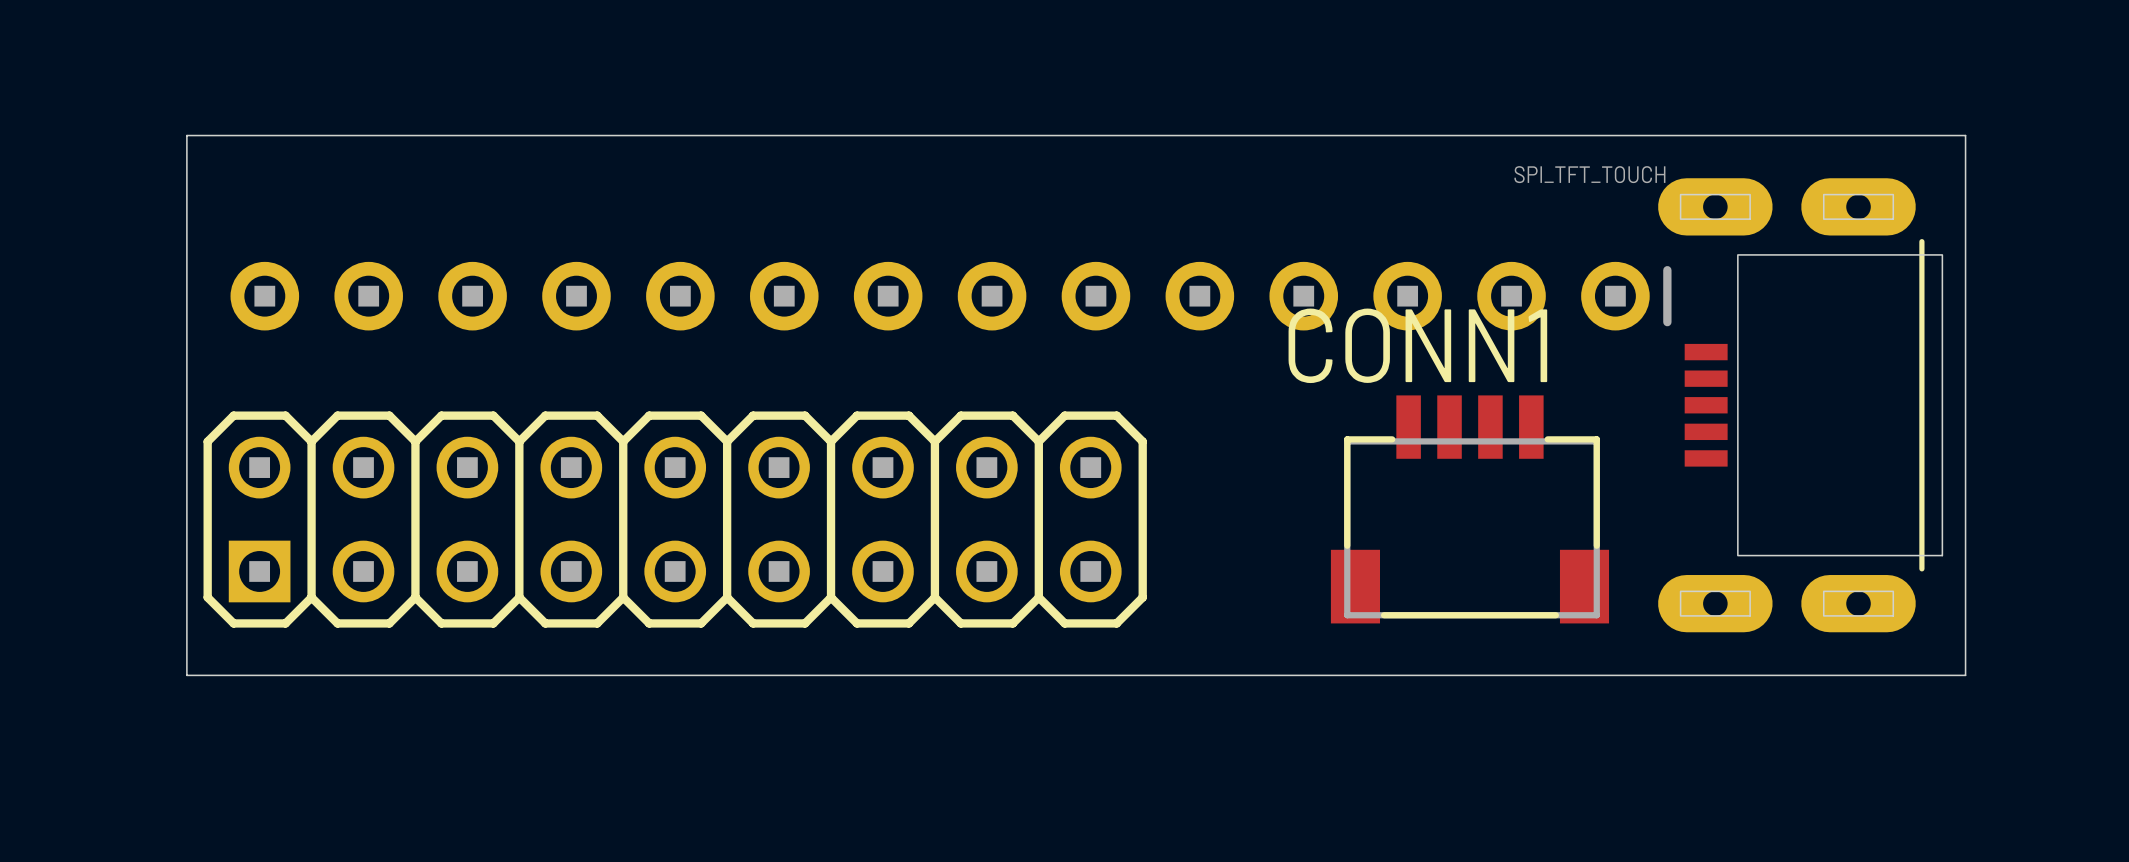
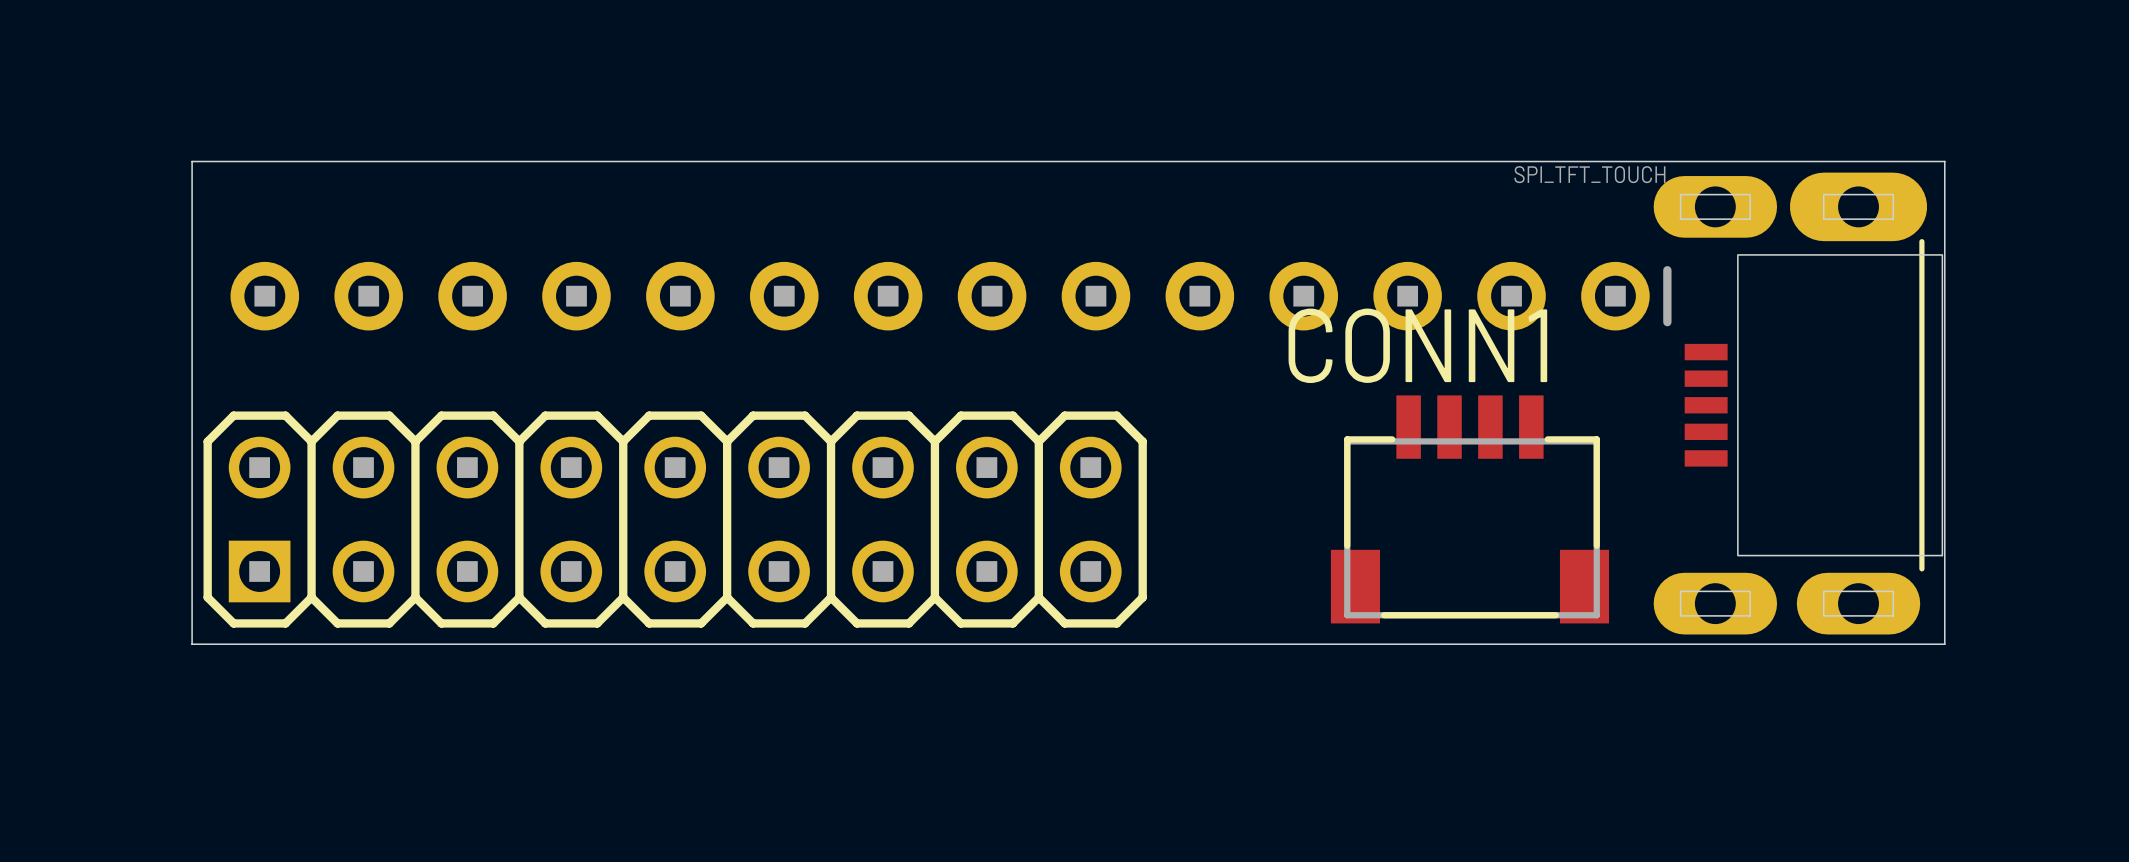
board edge: (186, 135) (1965, 135) (1965, 675) (186, 675) (186, 135) -> (192, 161) (192, 644) (1944, 644) (1944, 161) (192, 161)
part footprint: [1658, 178, 1943, 633] -> [1653, 172, 1943, 635]

